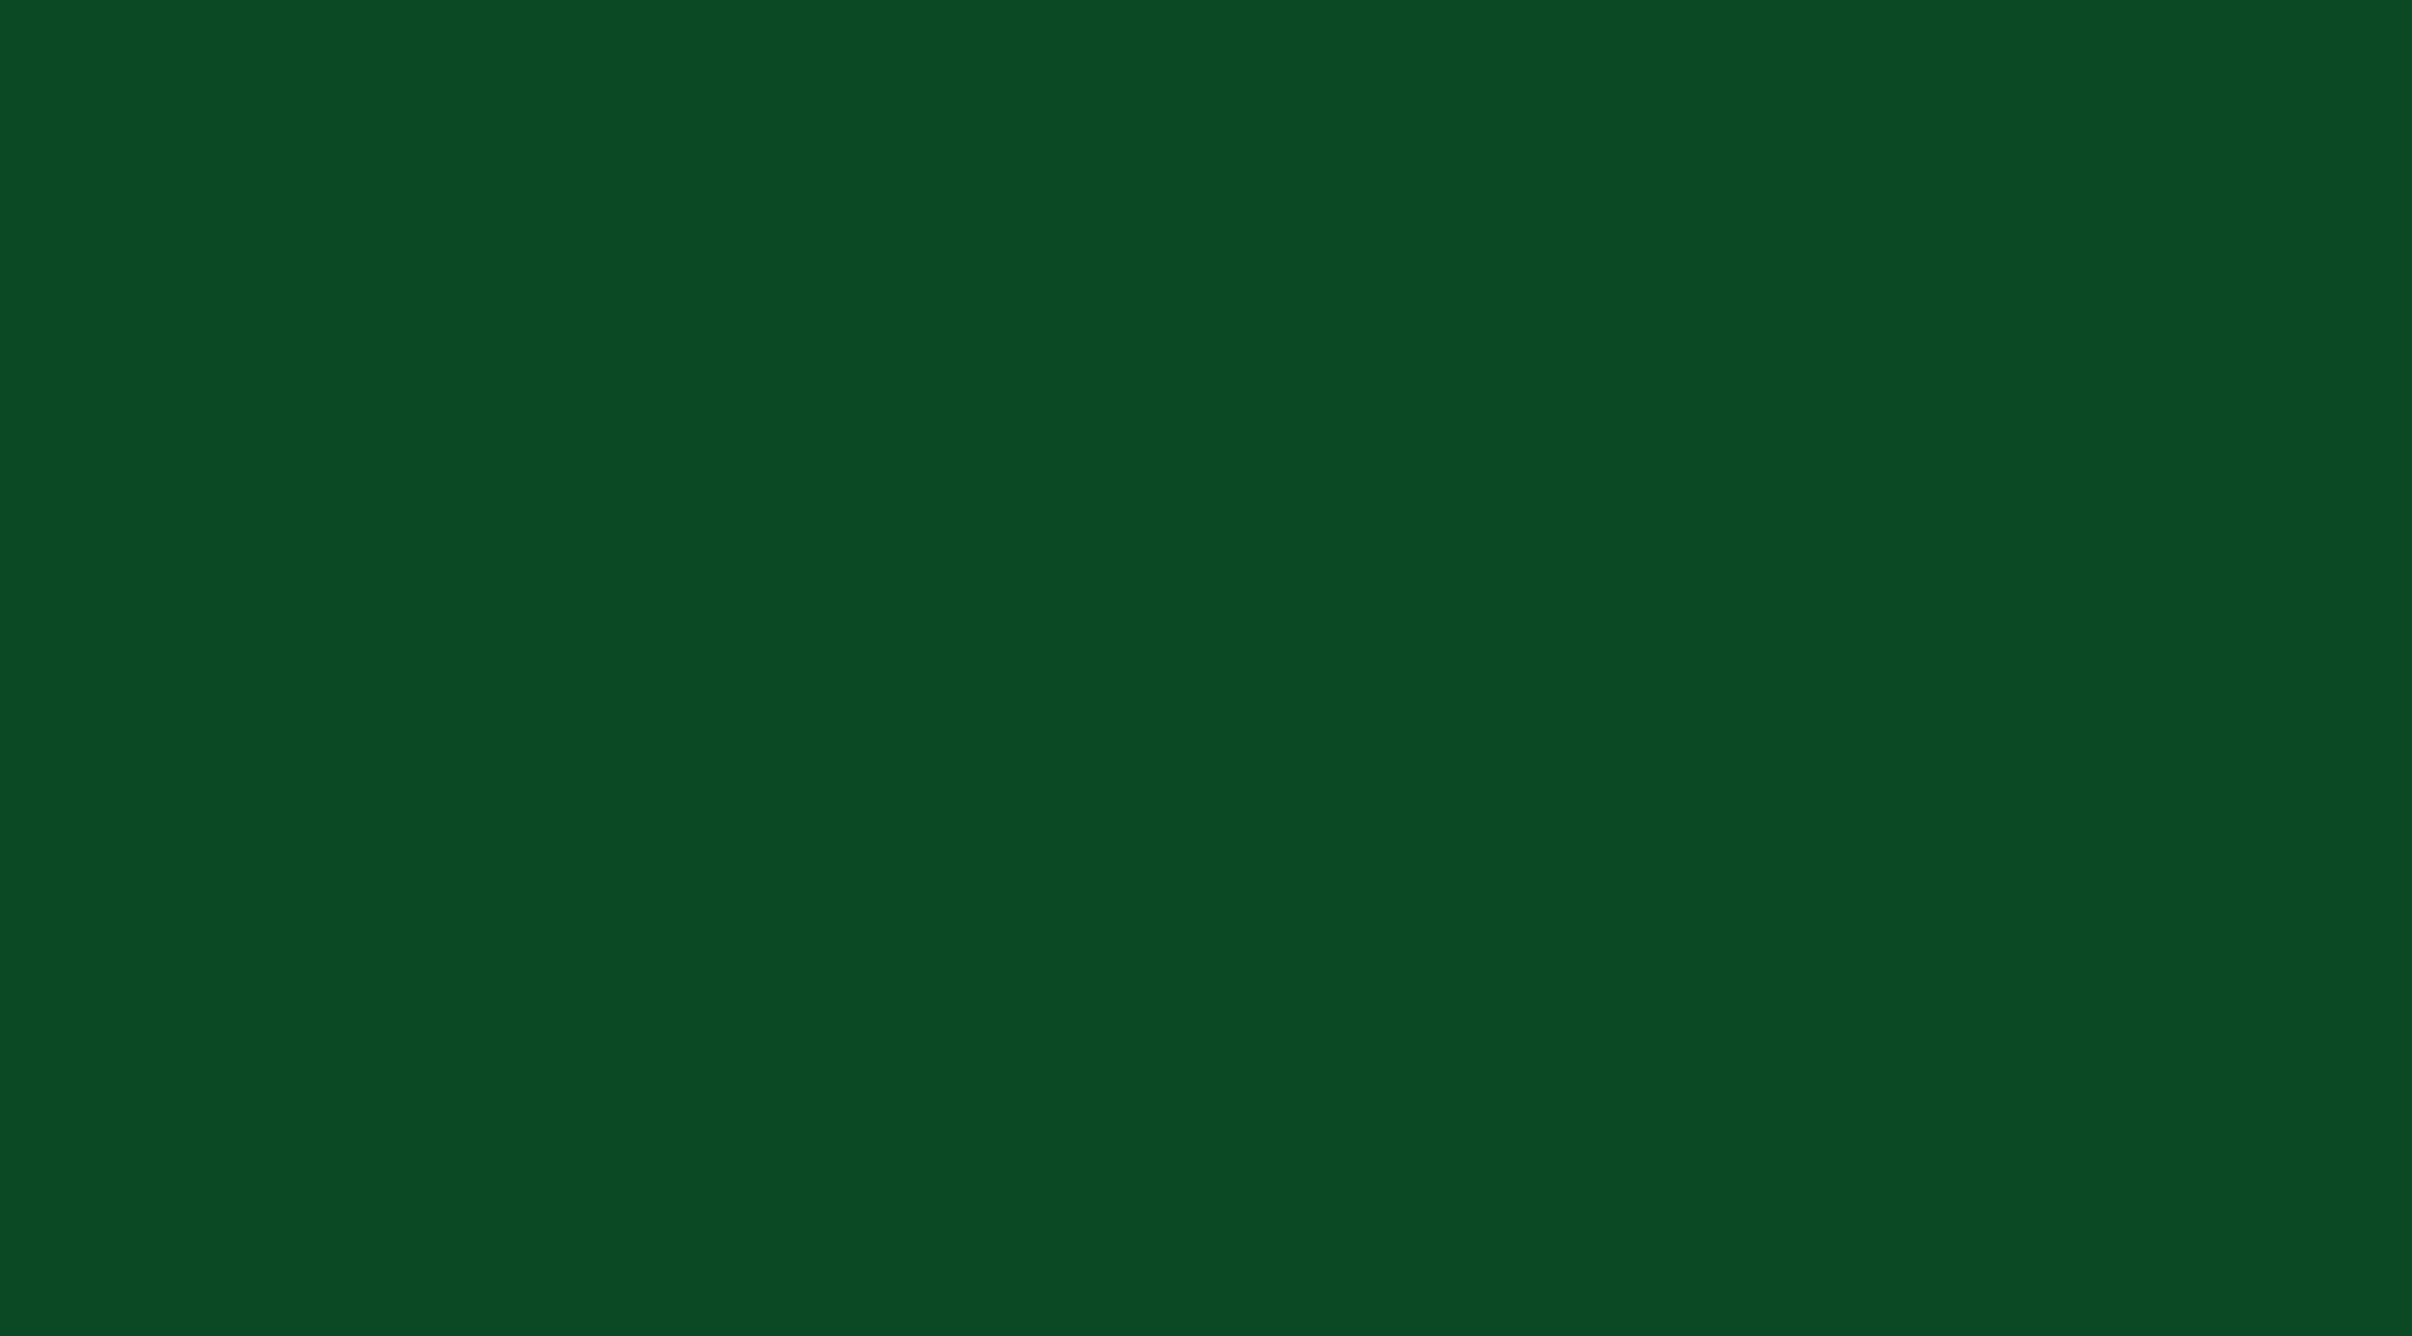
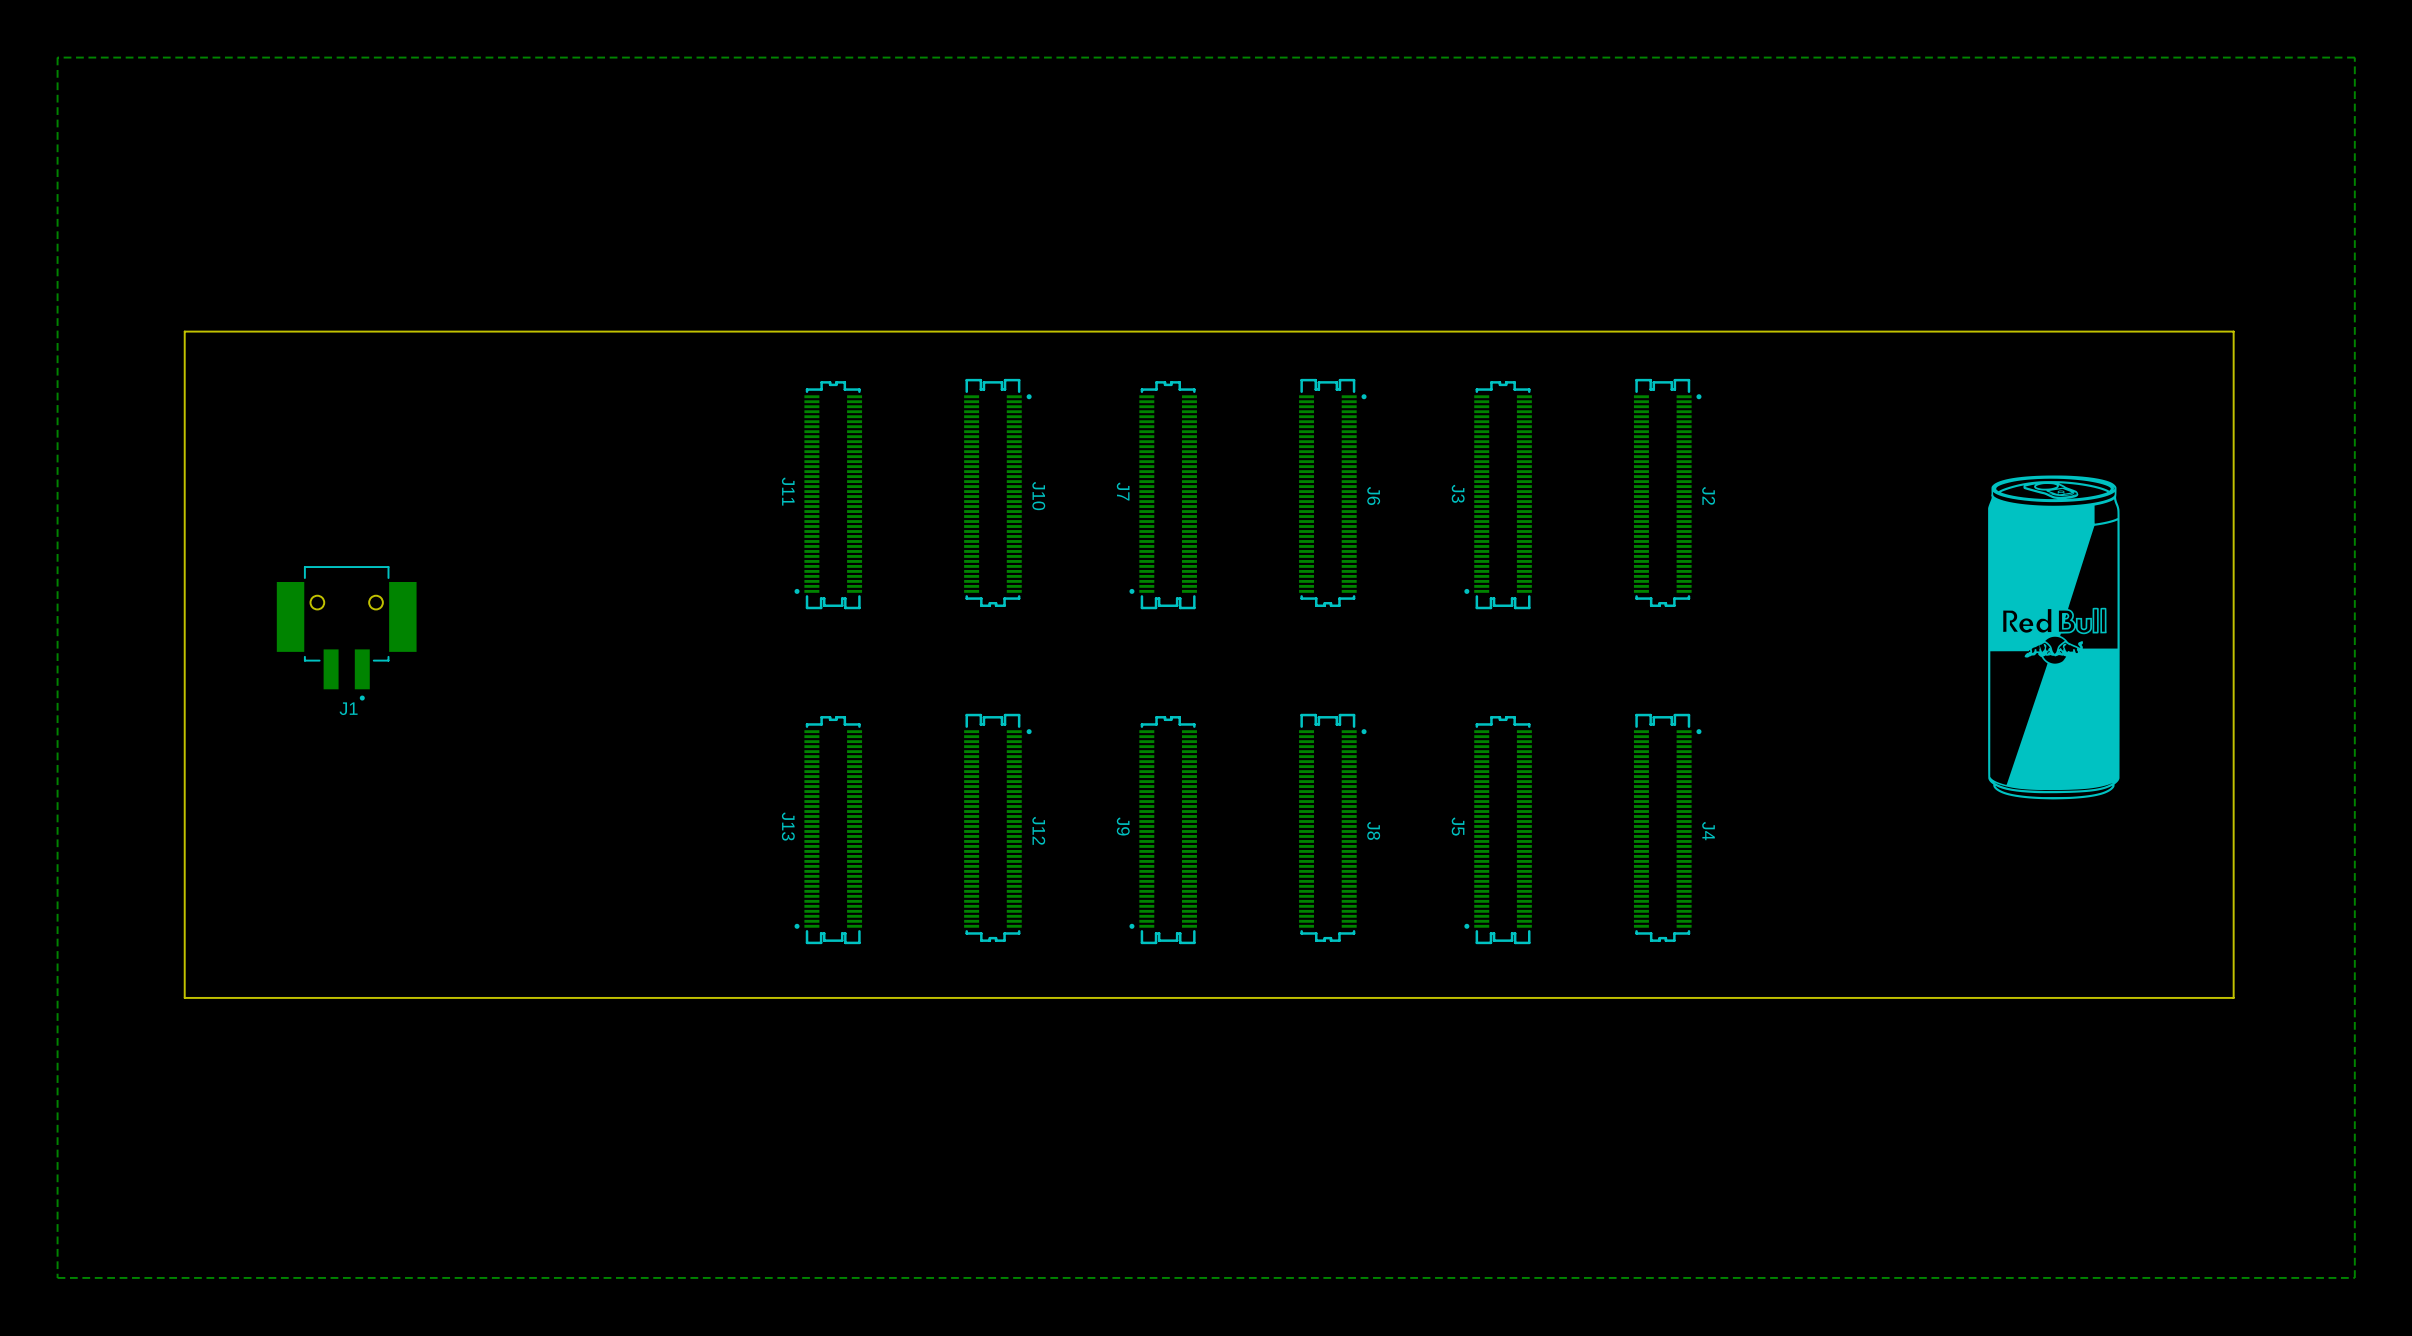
zone outline: none -> (2354, 57) (57, 57) (57, 1277) (2354, 1277) (2354, 57)
board edge: none -> (2233, 331) (184, 331) (184, 997) (2233, 997) (2233, 331)
drawing: none -> [1988, 475, 2120, 800]
J10: none -> (997, 492)
J6: none -> (1332, 492)
J2: none -> (1667, 492)
J11: none -> (828, 495)
J7: none -> (1163, 495)
J3: none -> (1498, 495)
J1: none -> (346, 633)
J12: none -> (997, 827)
J8: none -> (1332, 827)
J4: none -> (1667, 827)
J13: none -> (828, 830)
J9: none -> (1163, 830)
J5: none -> (1498, 830)

